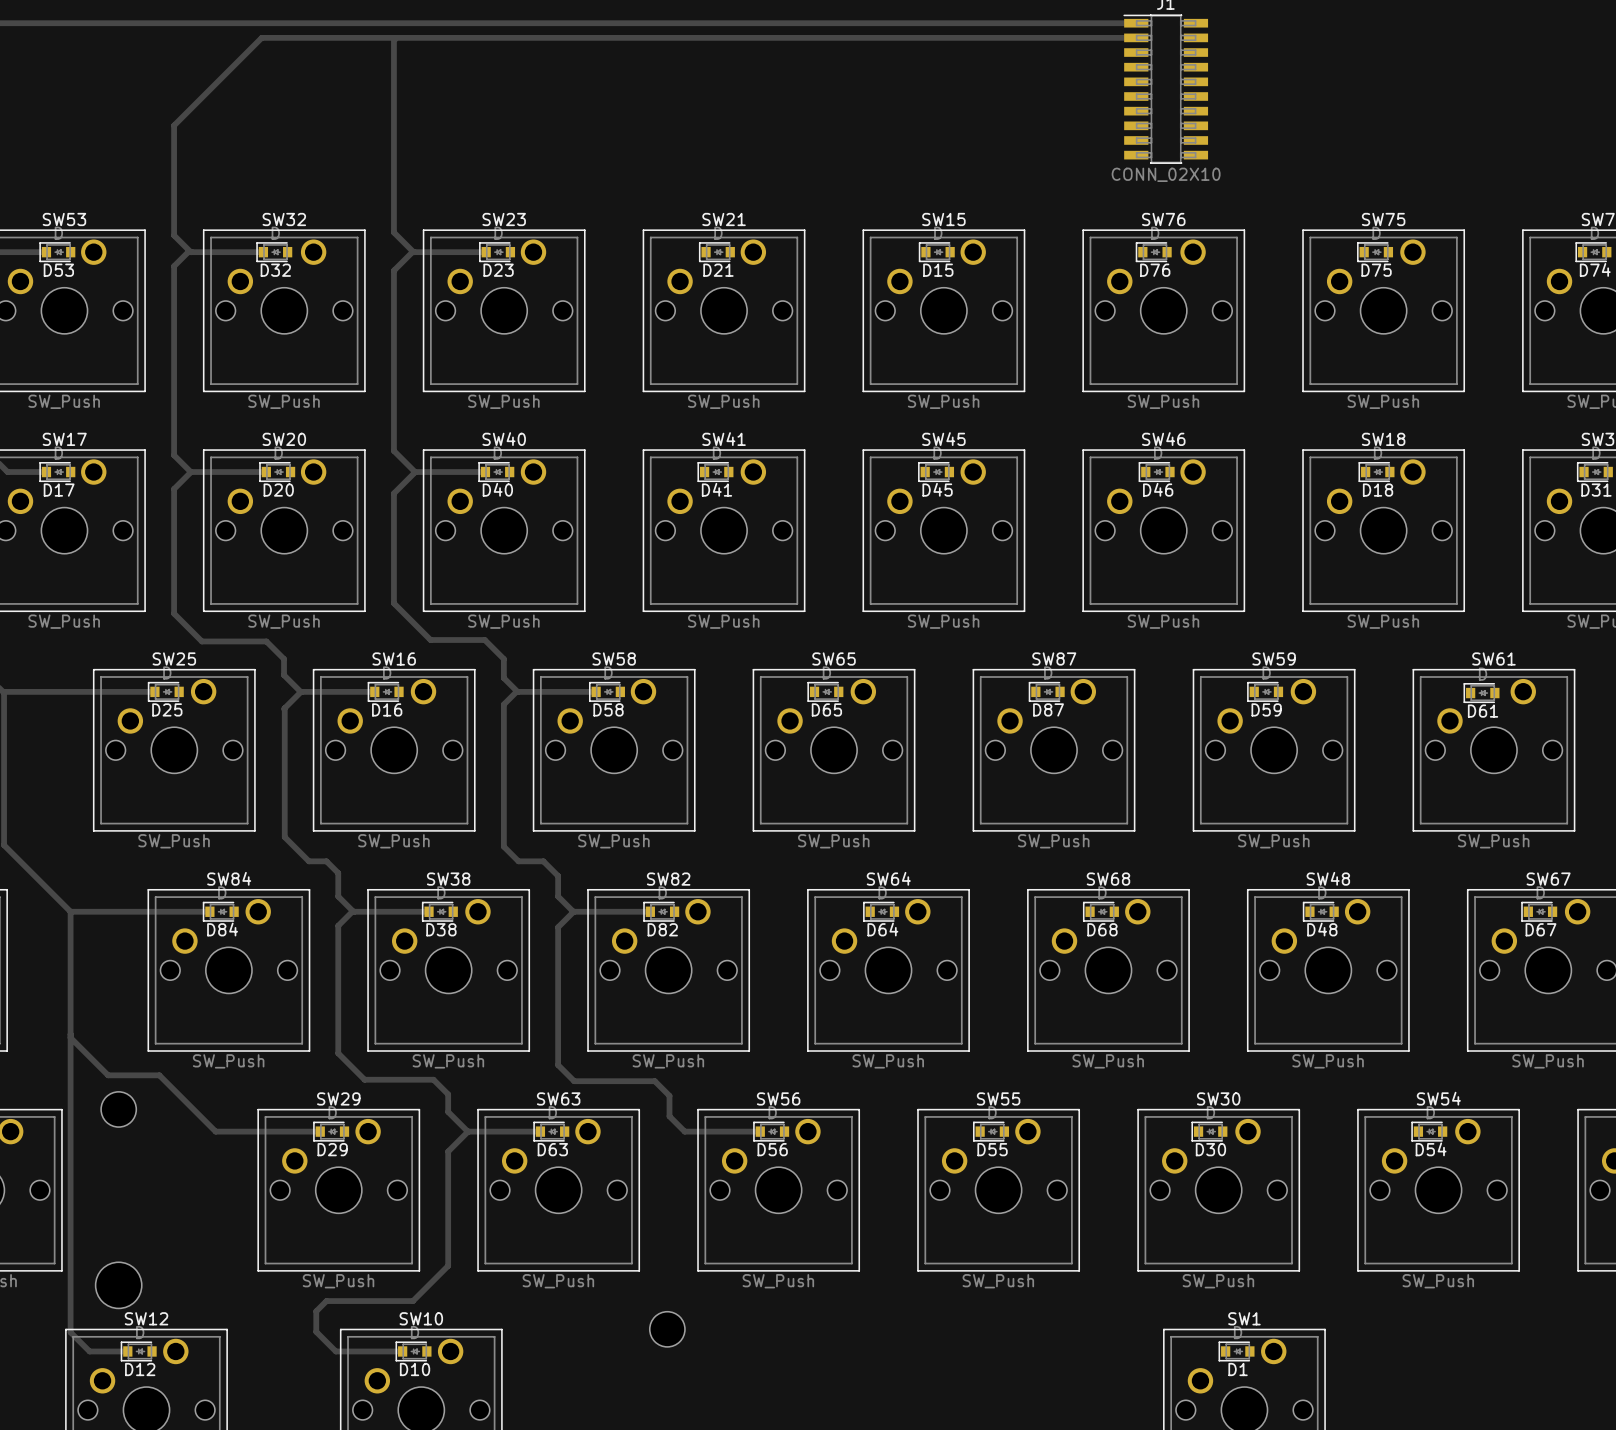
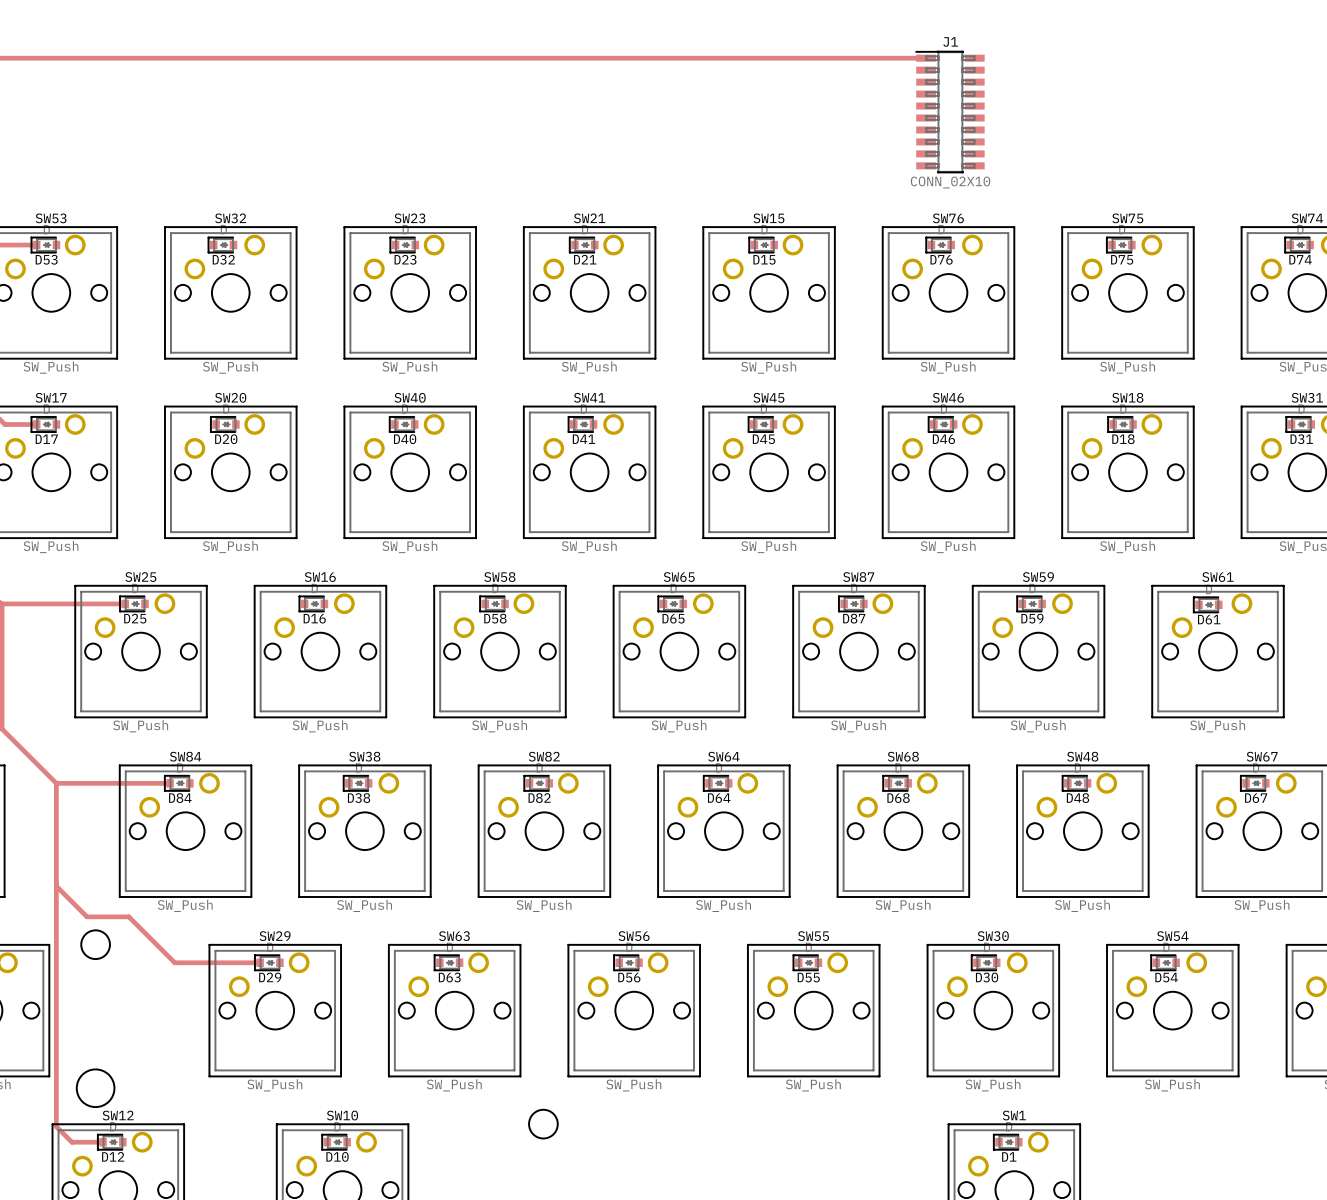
track: (395, 37) (393, 232) (413, 252) -> none
track: (1136, 37) (261, 37) (174, 125) (174, 235) (190, 252) -> none
track: (263, 252) (188, 252) (174, 266) (174, 455) (190, 472) -> none
track: (486, 252) (412, 252) (393, 270) (393, 450) (415, 472) -> none
track: (190, 472) (266, 472) -> none
track: (190, 472) (174, 489) (174, 613) (201, 641) (266, 641) (284, 659) (284, 675) (300, 691) (374, 691) -> none
track: (415, 472) (393, 493) (393, 603) (430, 640) (484, 640) (503, 659) (503, 678) (517, 691) -> none
track: (415, 472) (485, 472) -> none
track: (301, 691) (284, 708) -> none
track: (596, 691) (516, 691) (503, 704) (503, 846) (518, 861) (543, 861) (558, 875) (558, 896) (573, 911) (650, 911) -> none
track: (284, 708) (284, 837) (308, 861) (326, 861) (338, 873) (338, 896) (353, 911) -> none
track: (429, 911) (352, 911) (338, 925) (338, 1053) (364, 1079) (433, 1079) (448, 1094) (448, 1111) (467, 1131) (540, 1131) -> none
track: (573, 911) (558, 927) (558, 1065) (574, 1081) (654, 1081) (669, 1095) (669, 1116) (684, 1131) (760, 1131) -> none
track: (468, 1131) (448, 1151) (448, 1265) (413, 1301) (326, 1301) (316, 1311) (316, 1331) (335, 1351) (402, 1351) -> none

